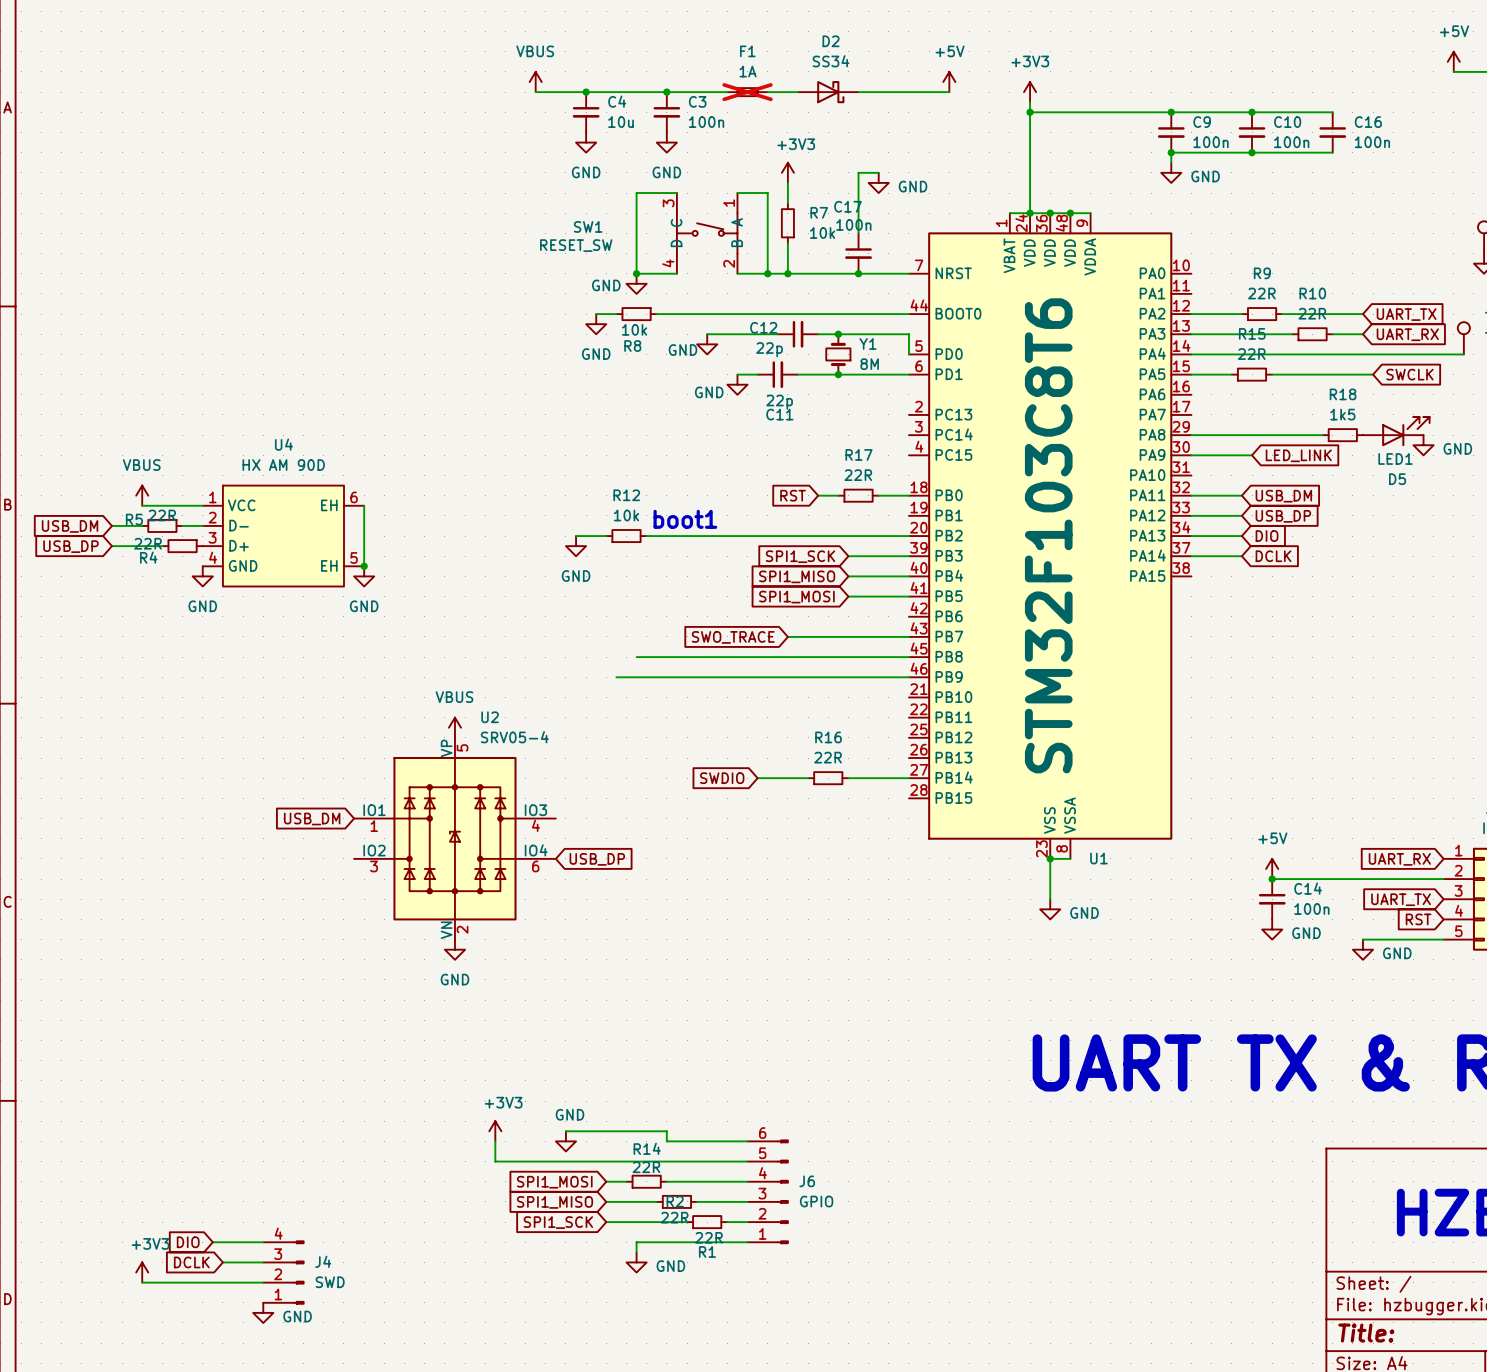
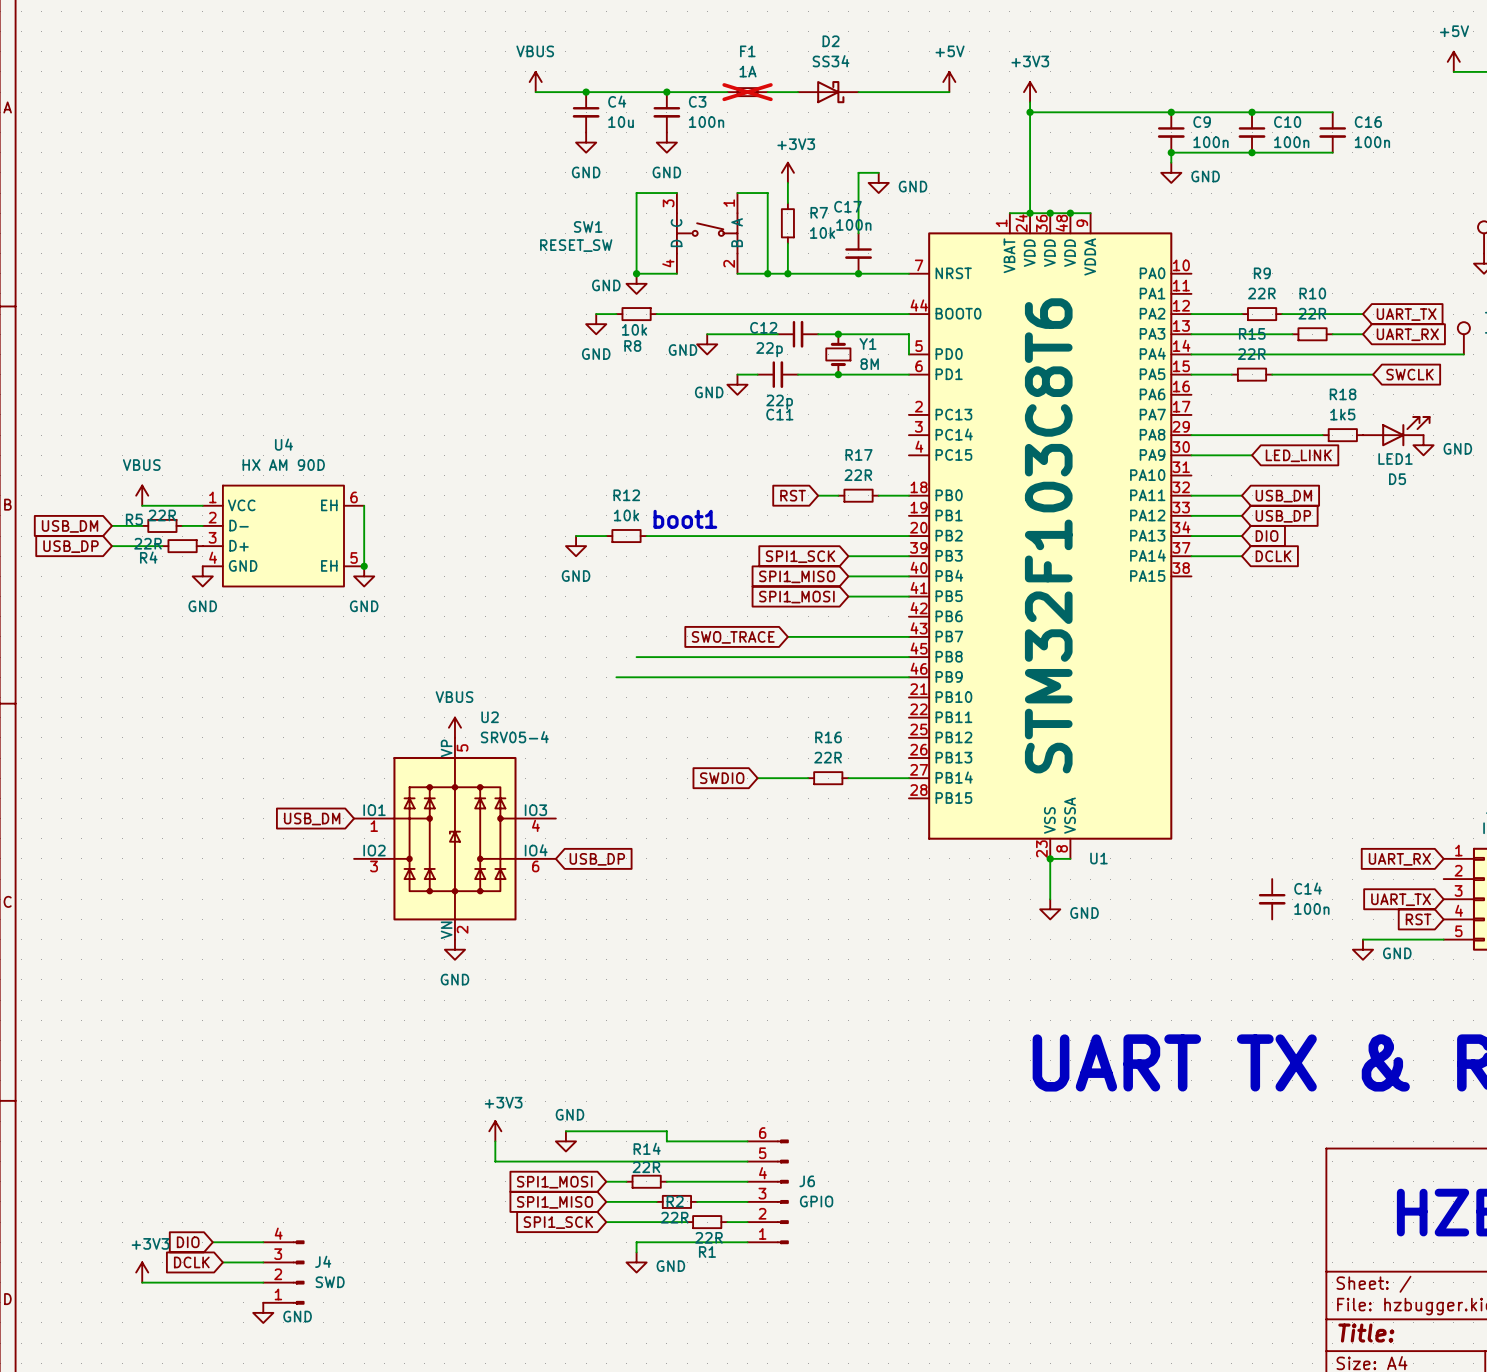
power symbol: +5V (1272, 868) -> none
wire: (1272, 879) (1443, 879) -> none
junction: (1272, 879) -> none
power symbol: GND (1272, 929) -> none

